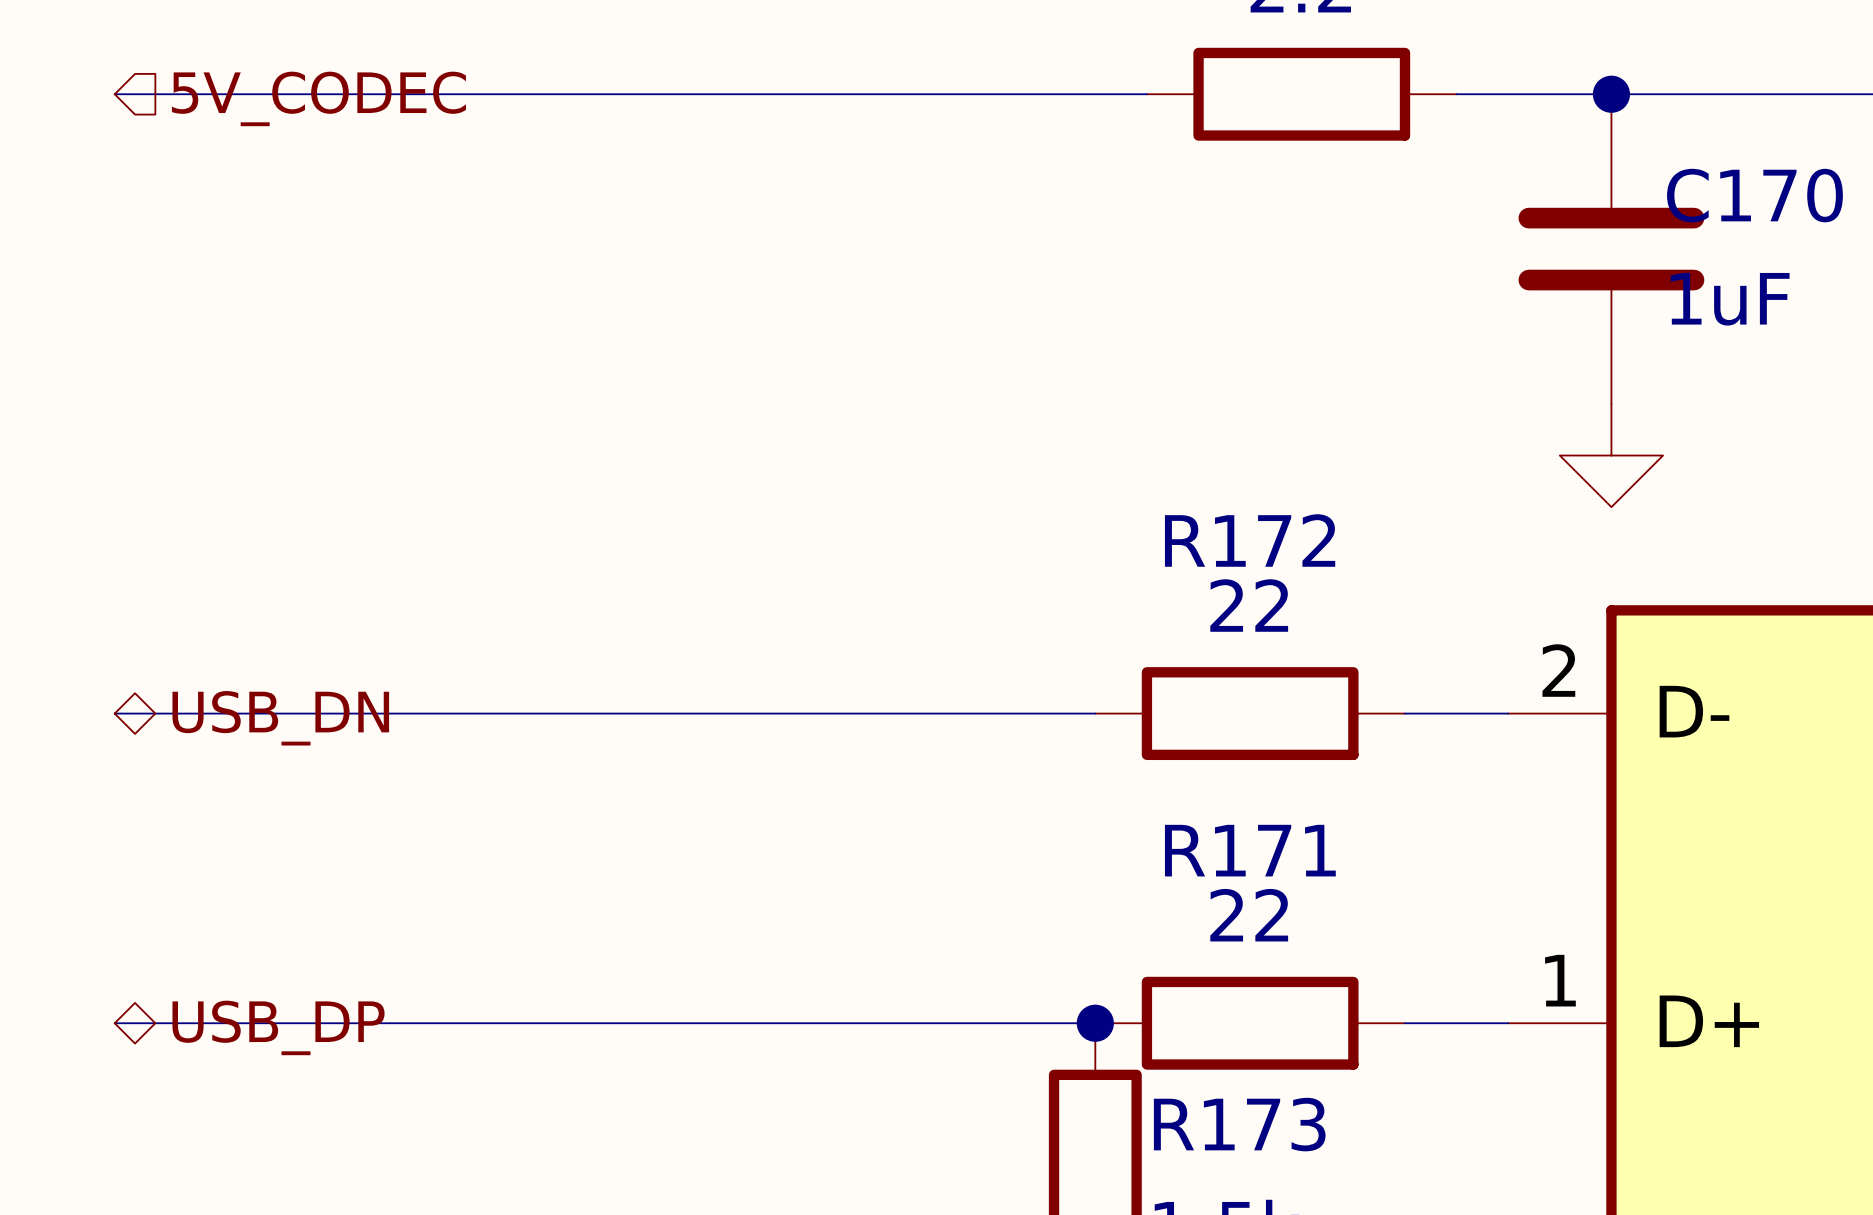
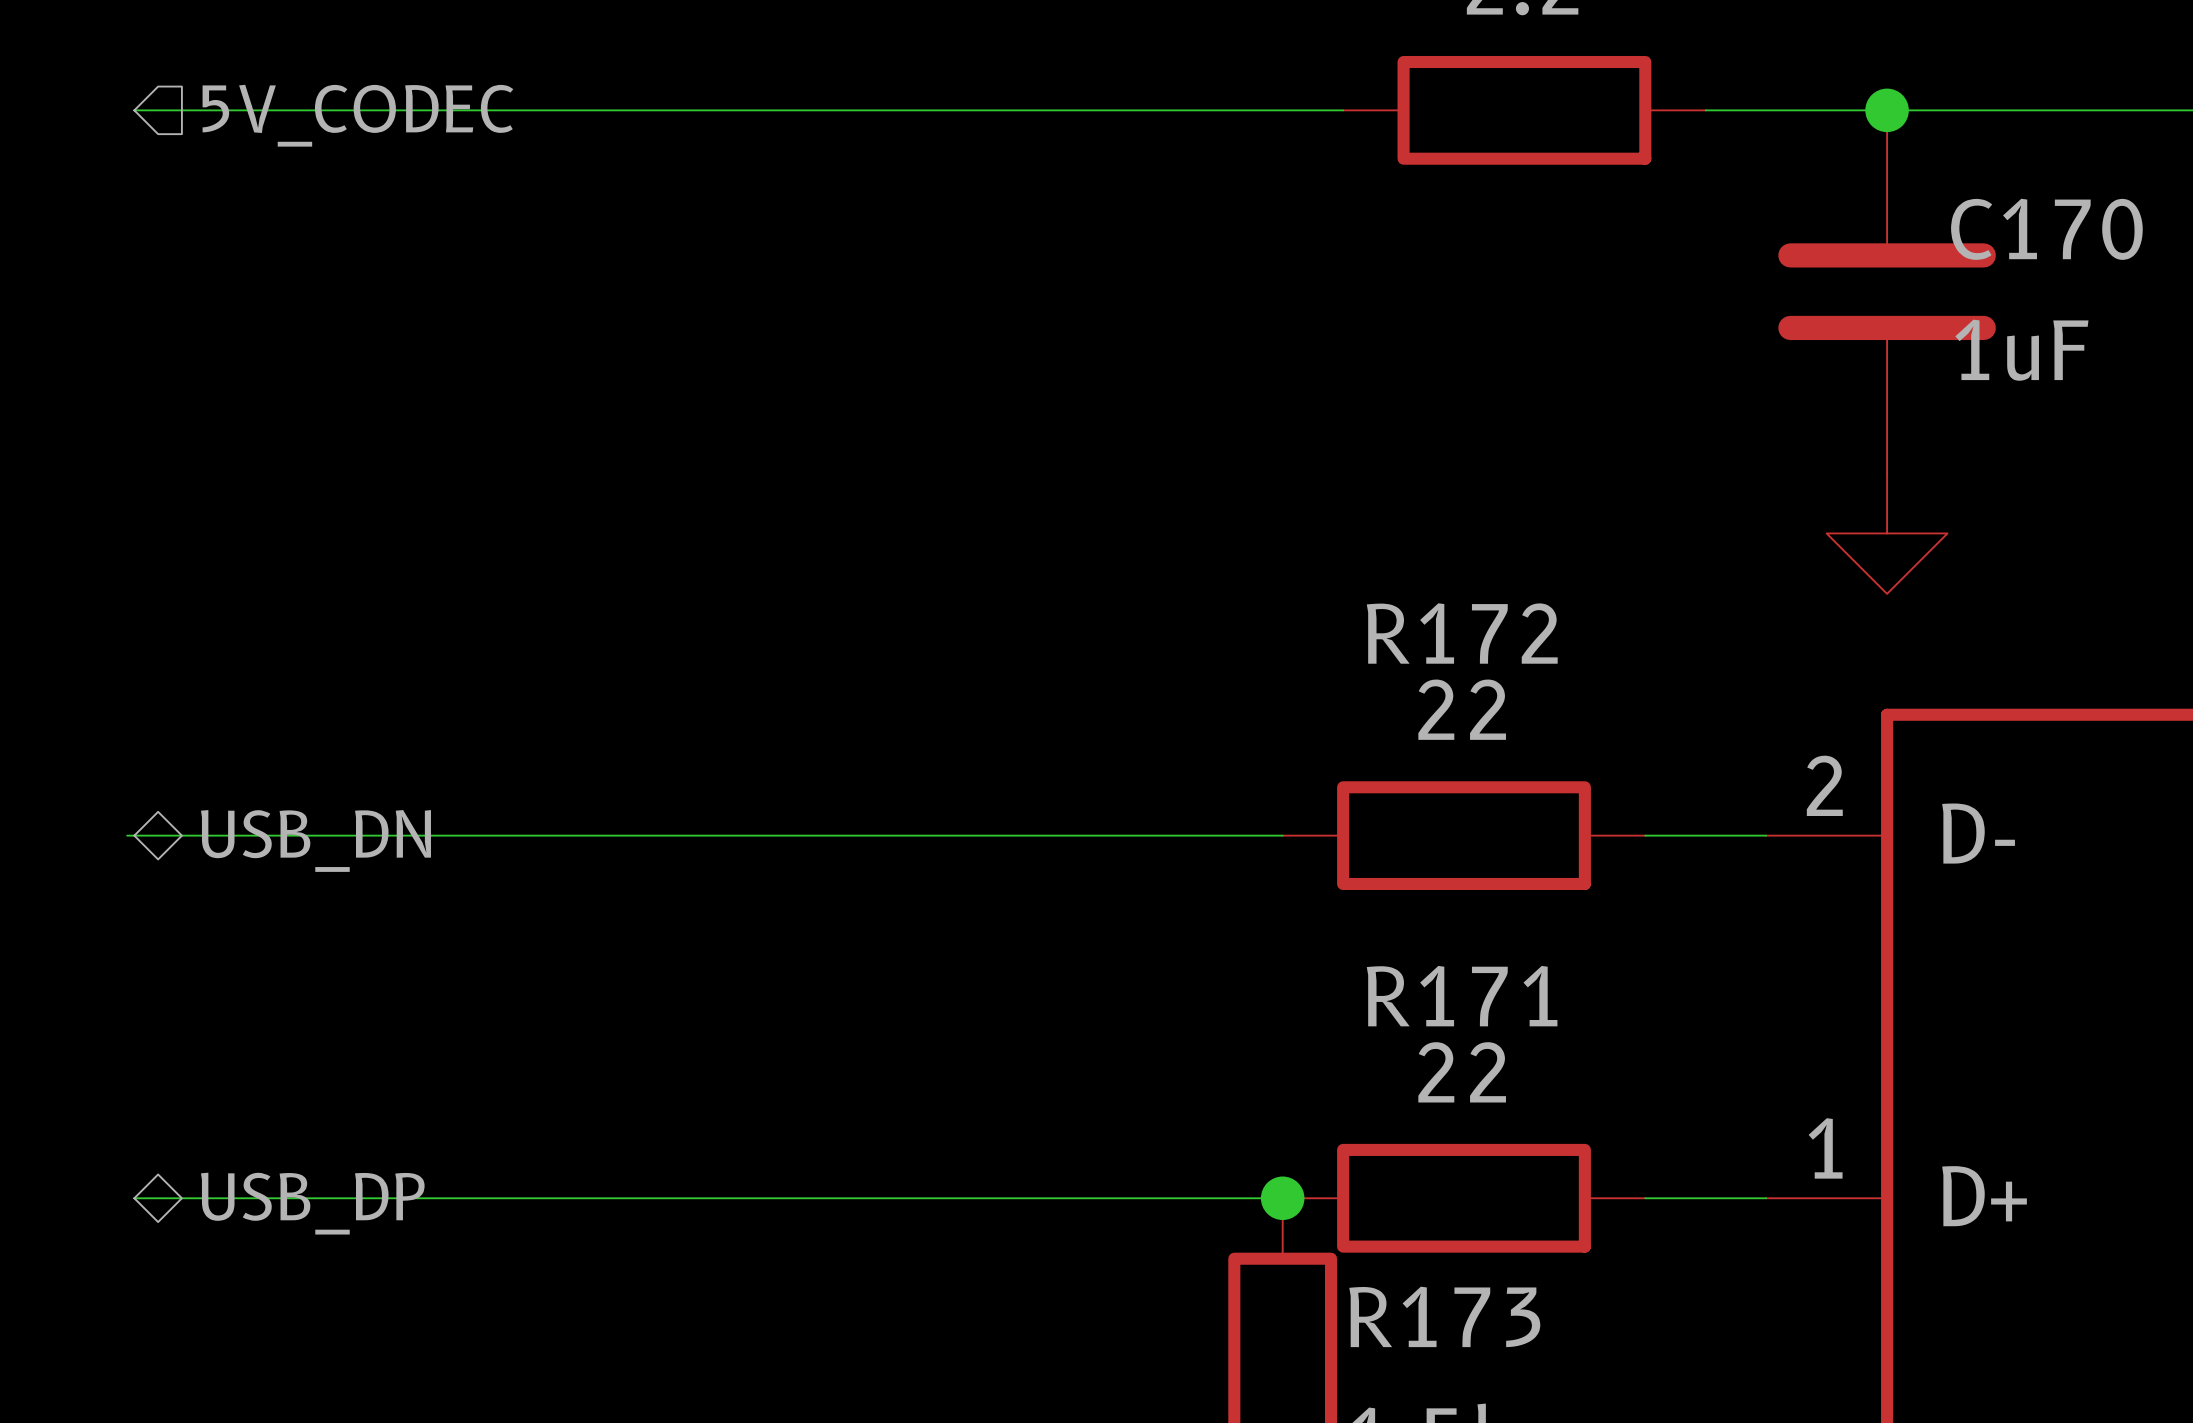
wire: none -> (127, 835) (134, 835)

